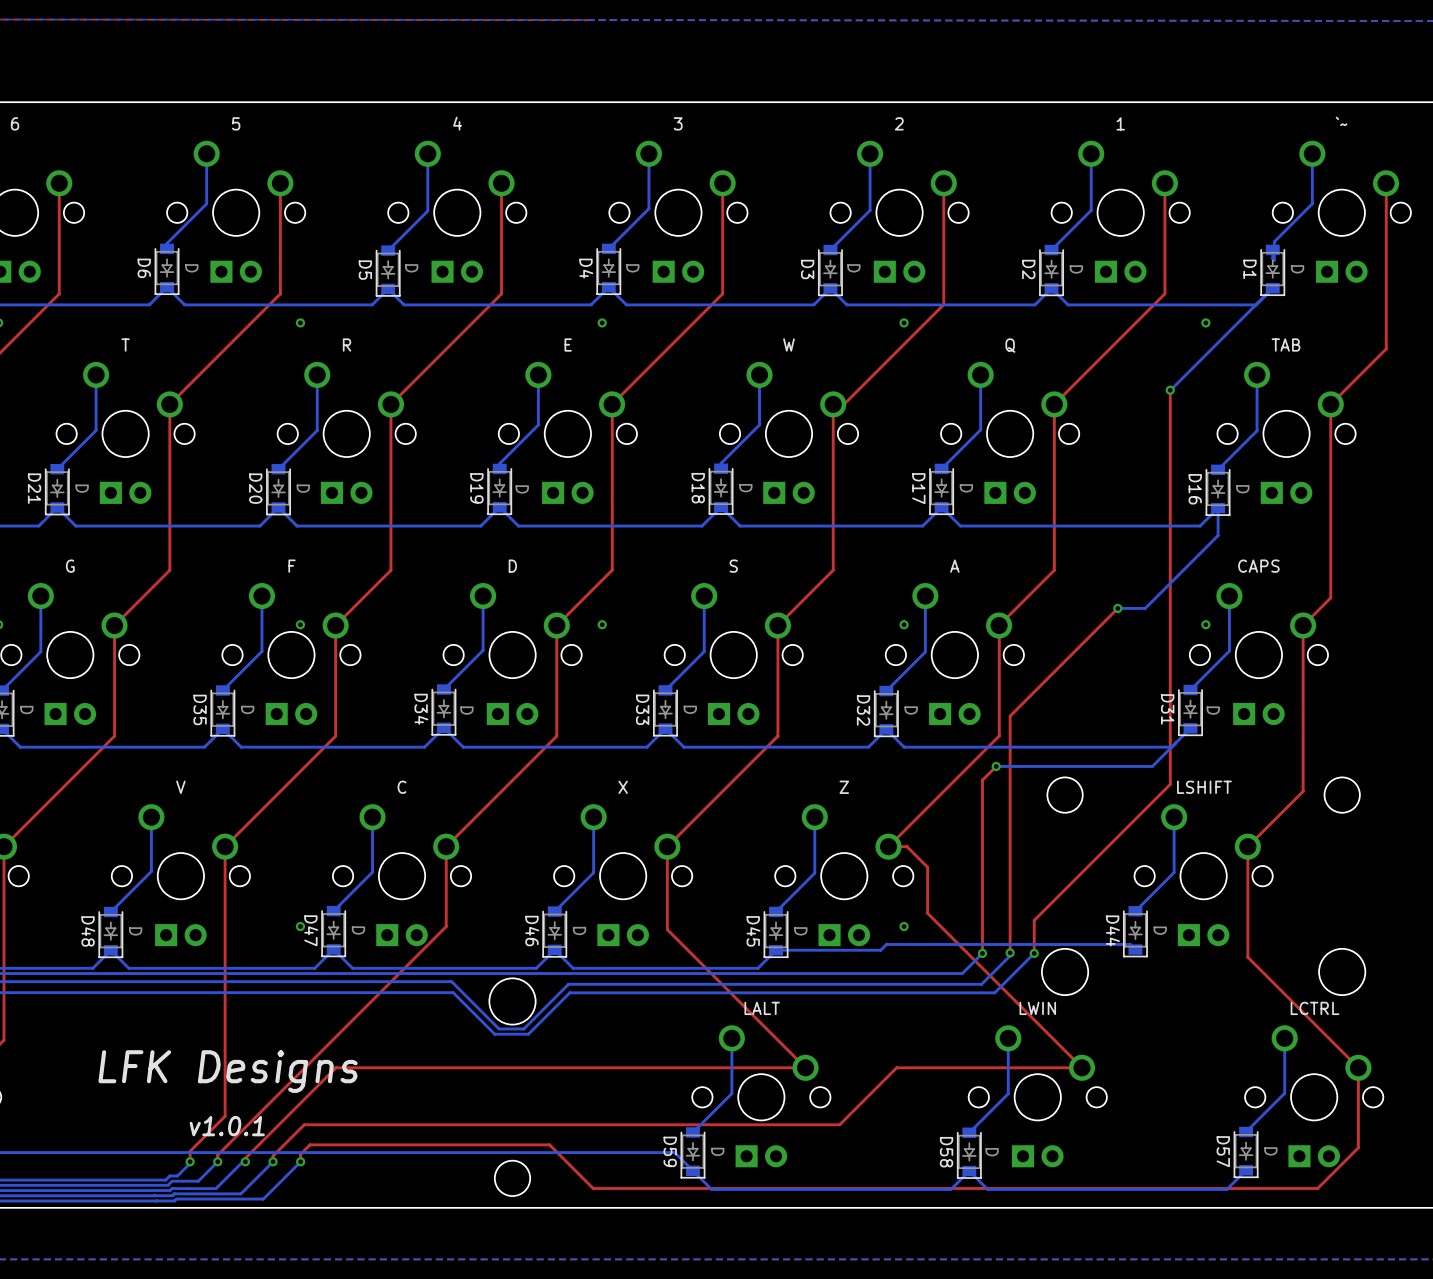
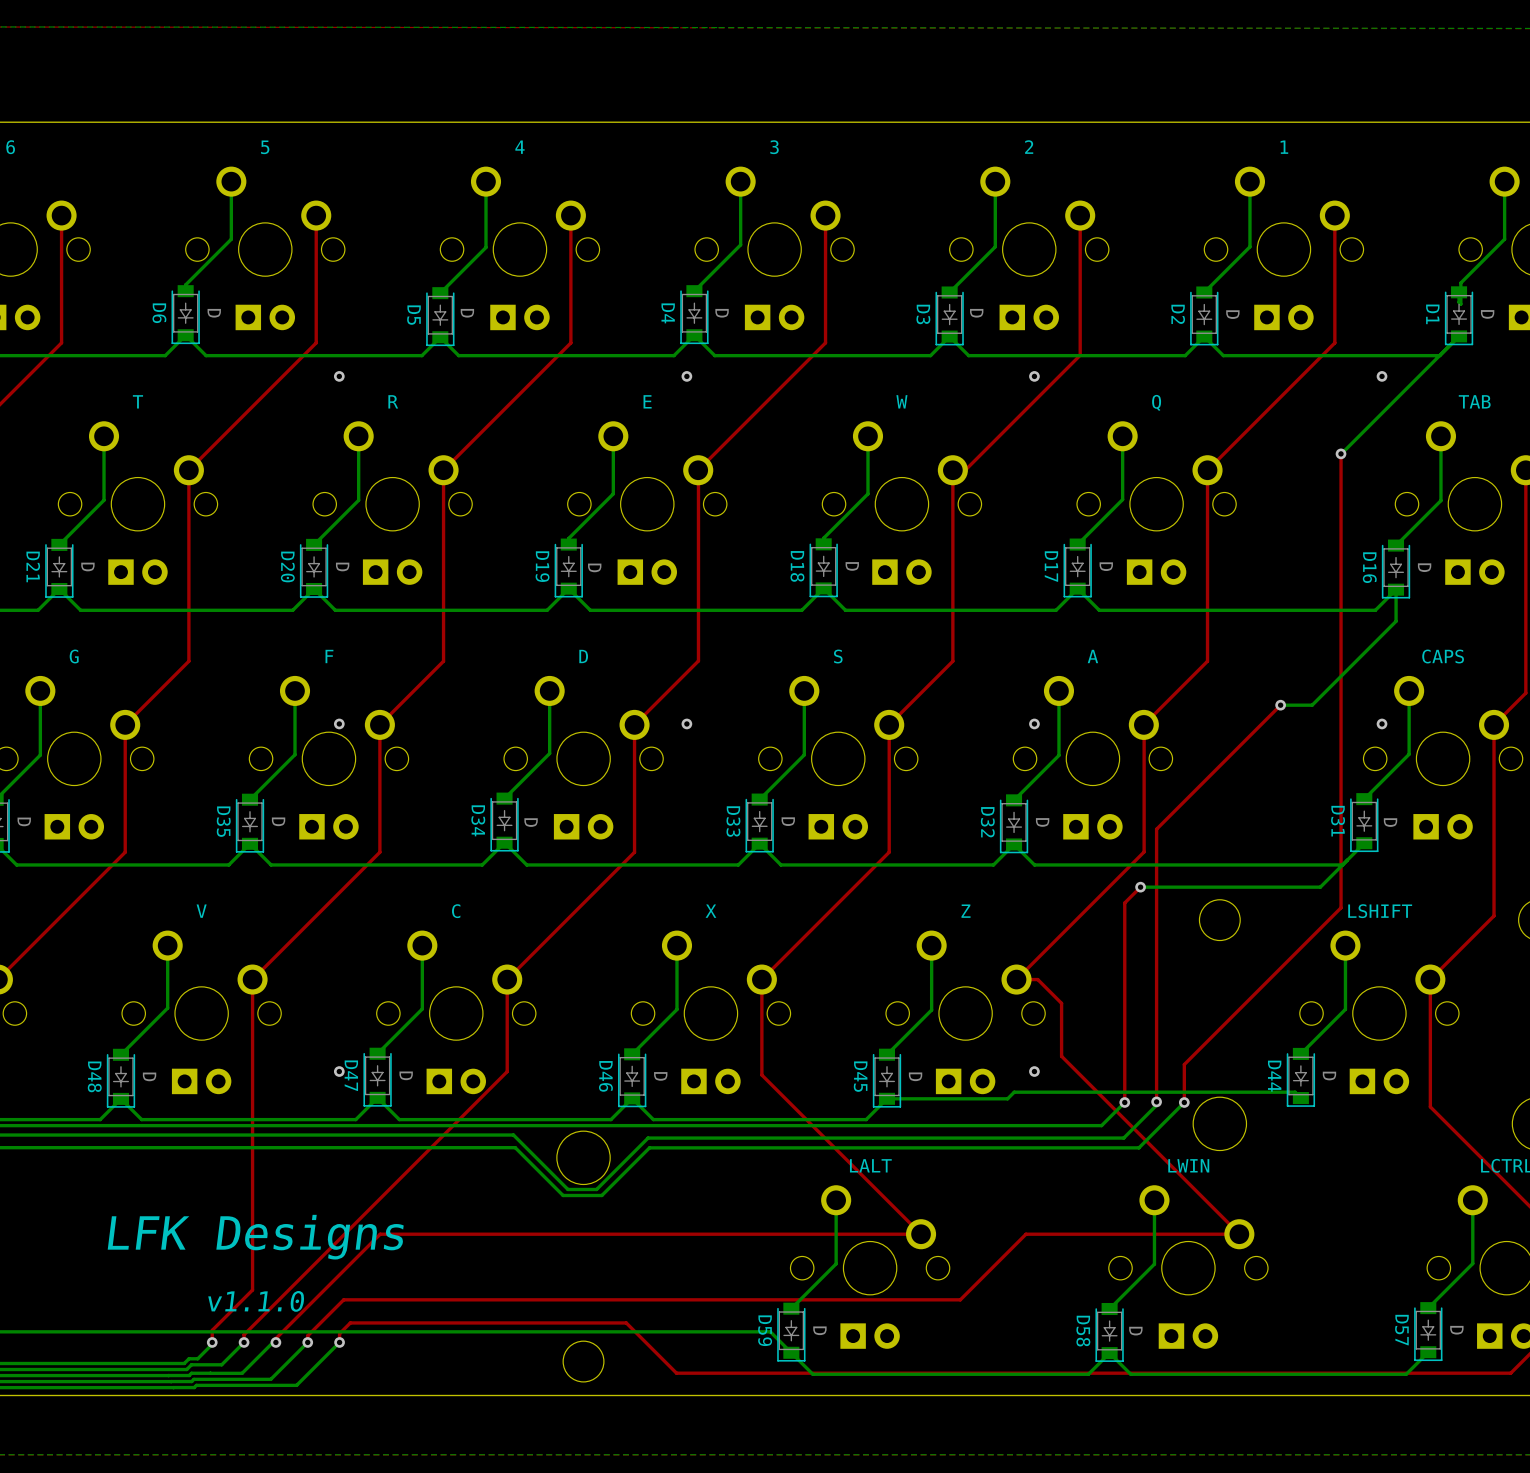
part text: v1.0.1 (227, 1126) -> v1.1.0 (256, 1301)

